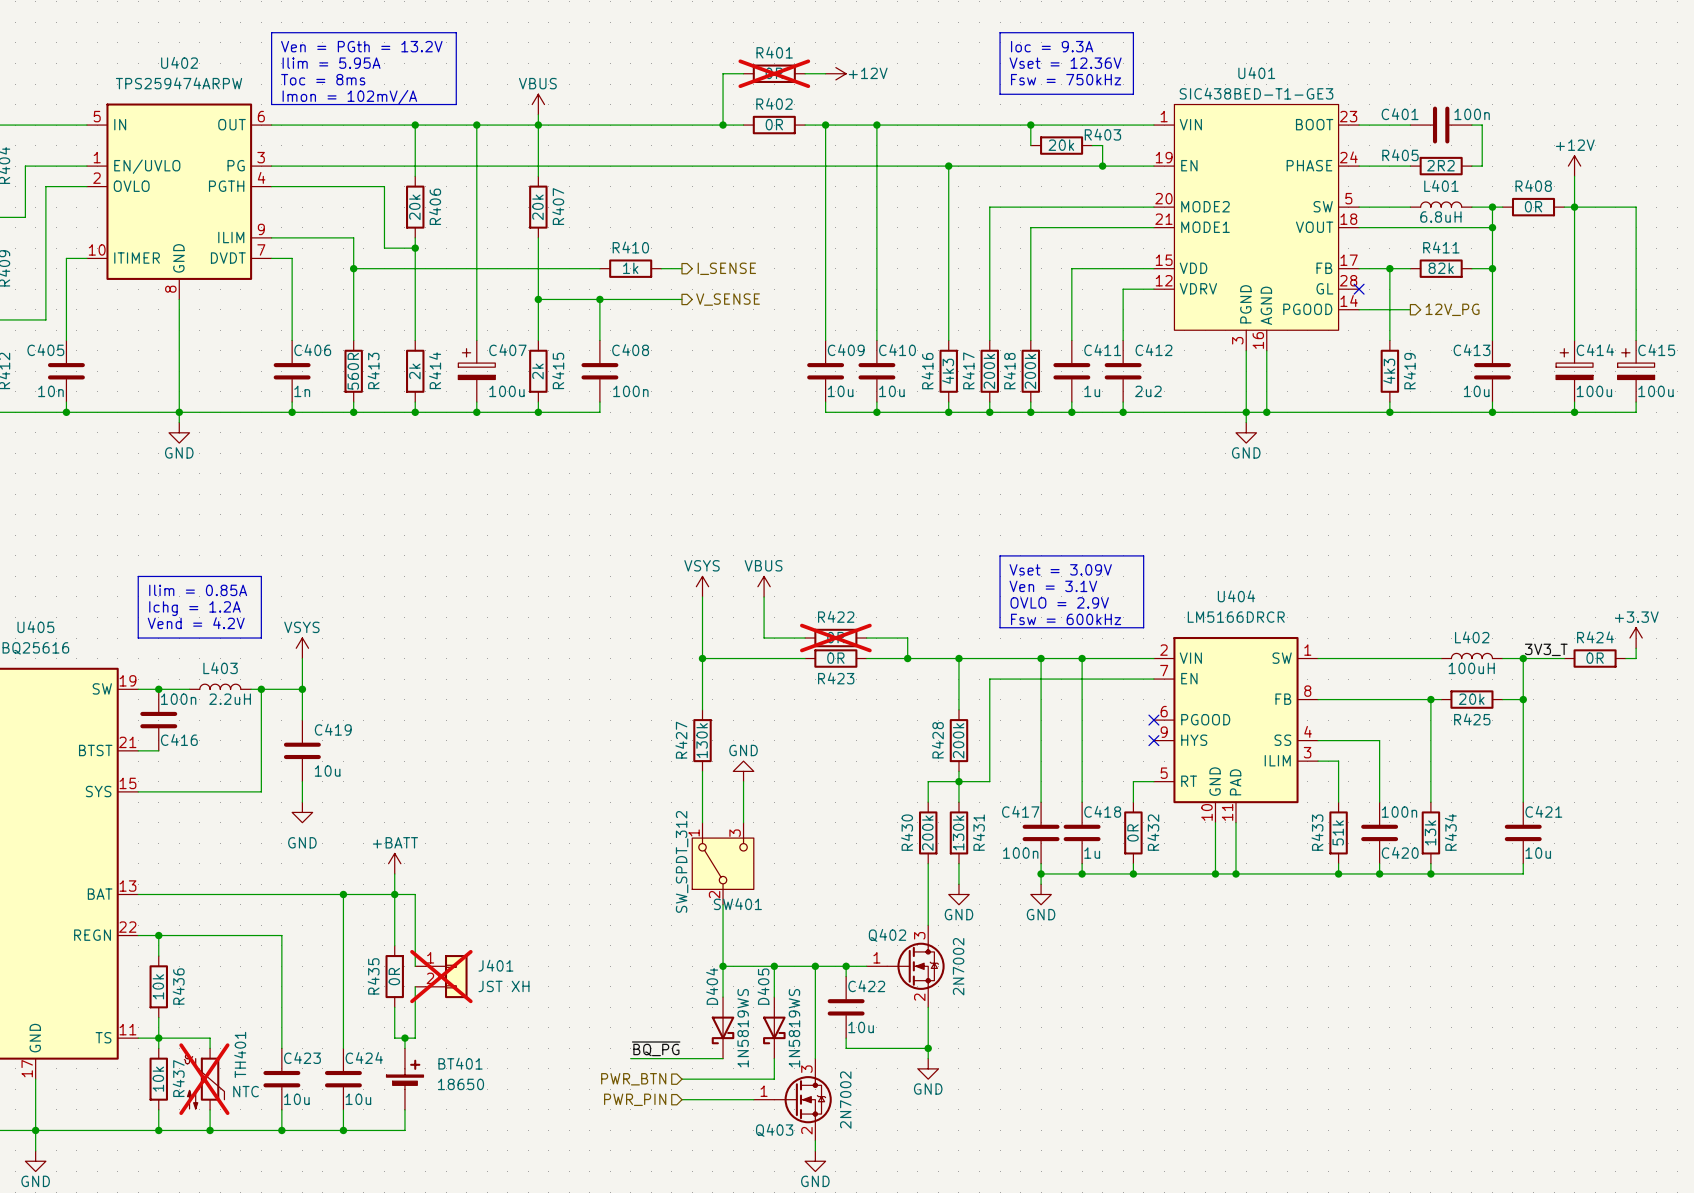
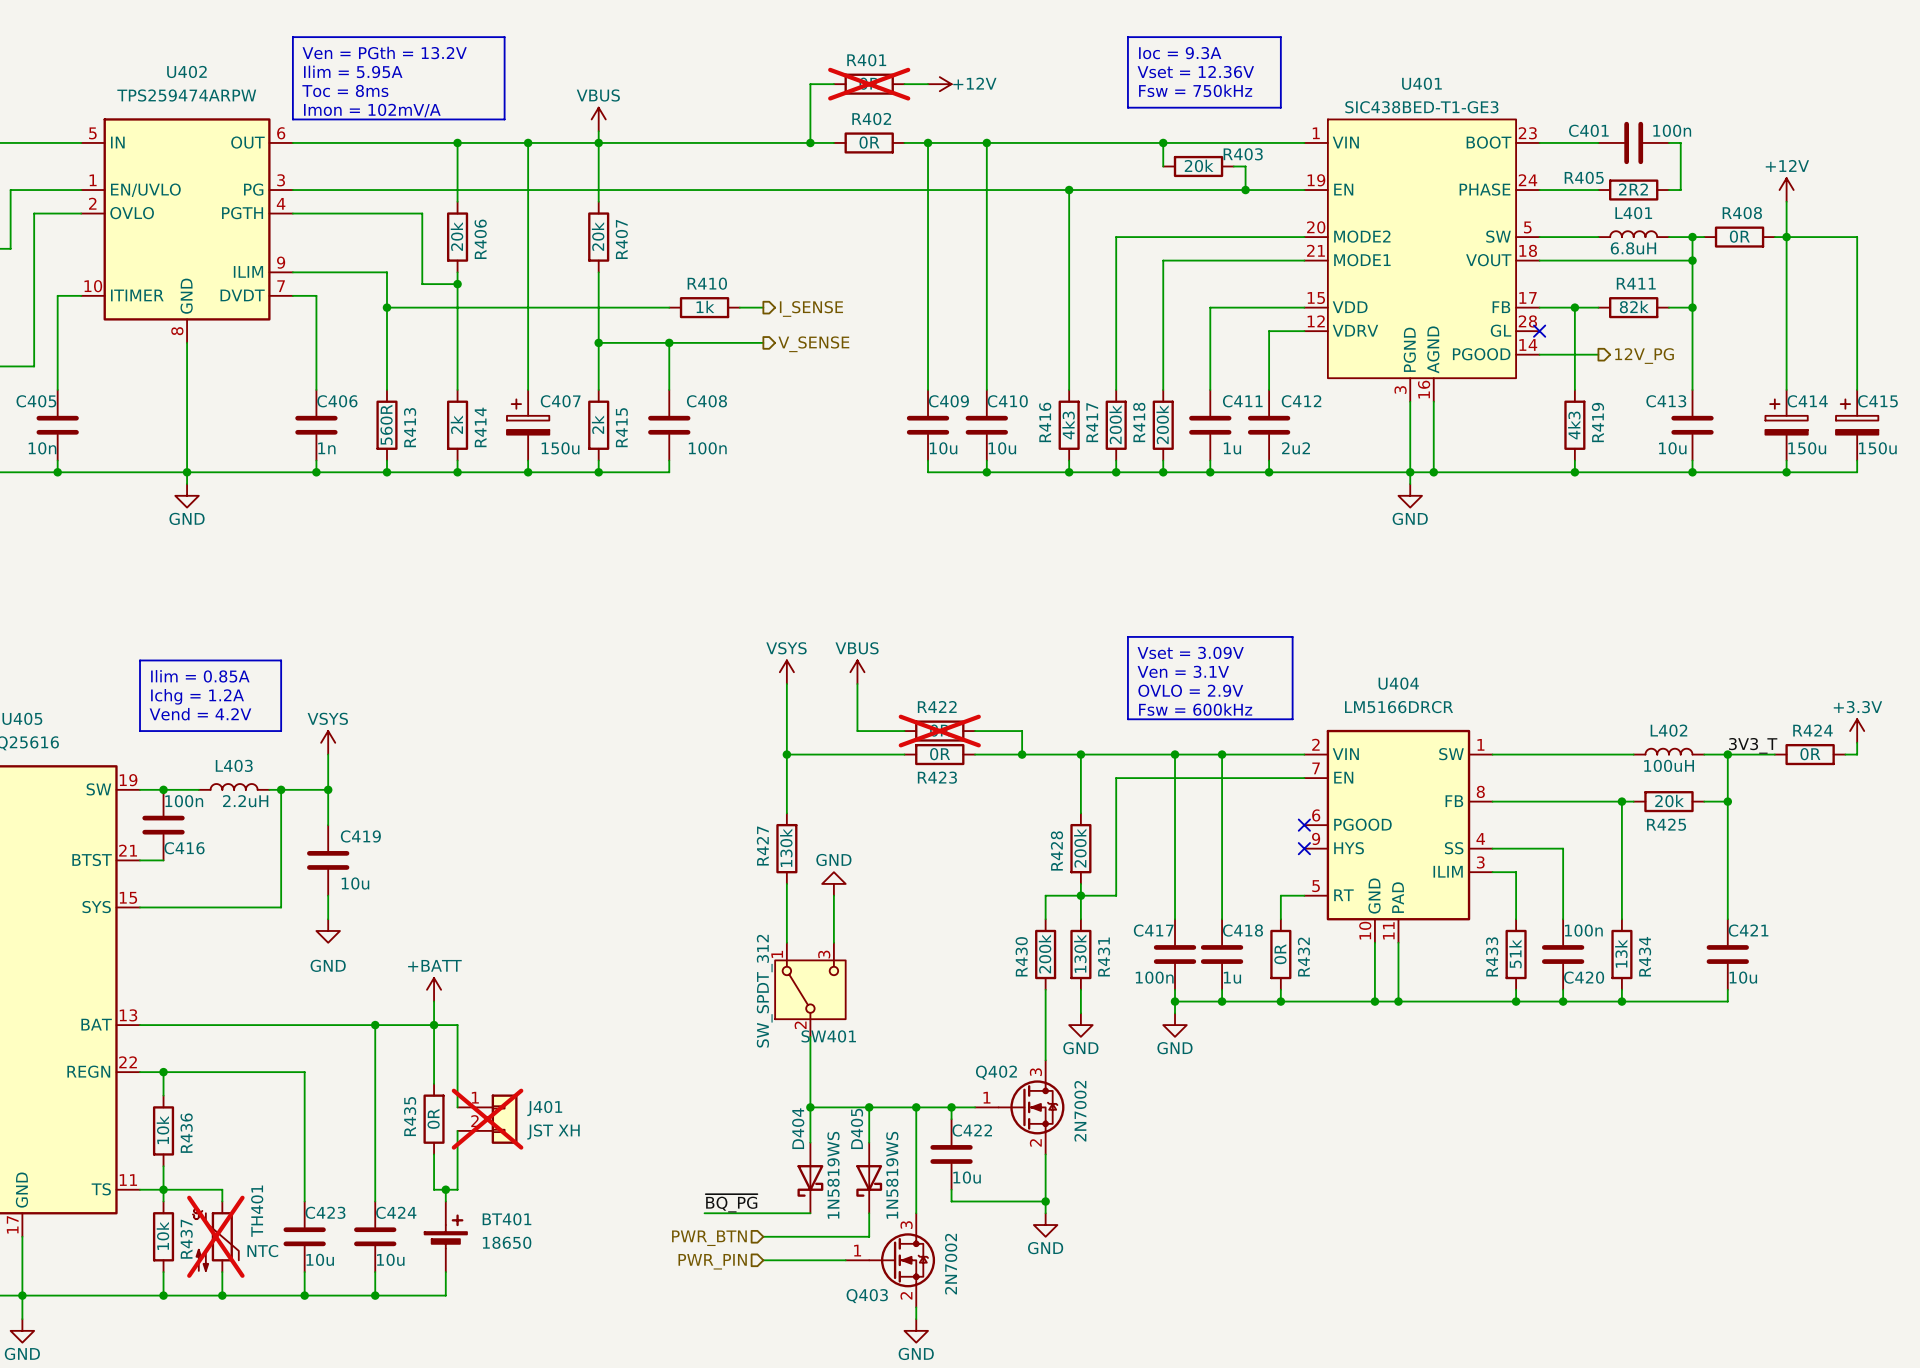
C407 value: 100u (506, 391) -> 150u (560, 448)
C414 value: 100u (1594, 391) -> 150u (1807, 448)
C415 value: 100u (1655, 391) -> 150u (1877, 448)

